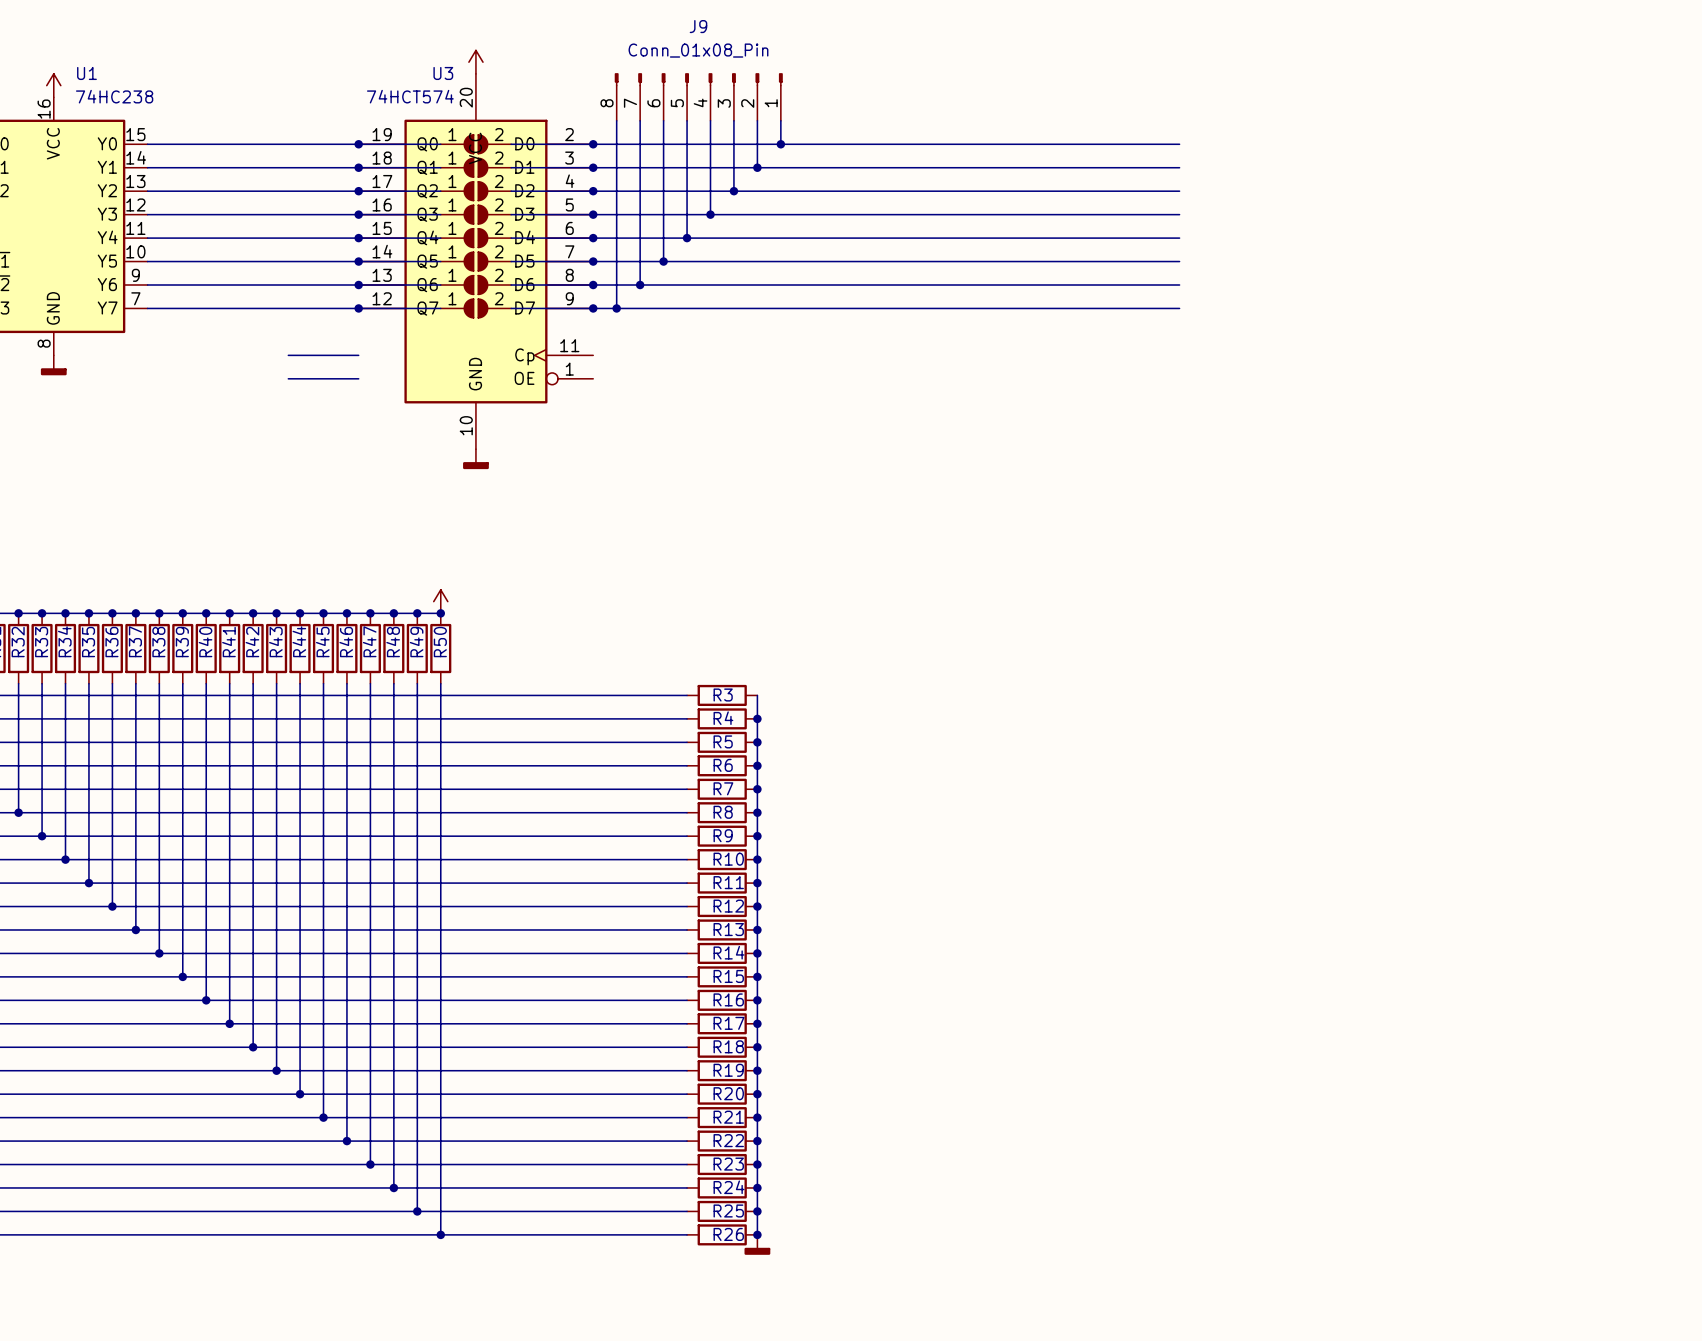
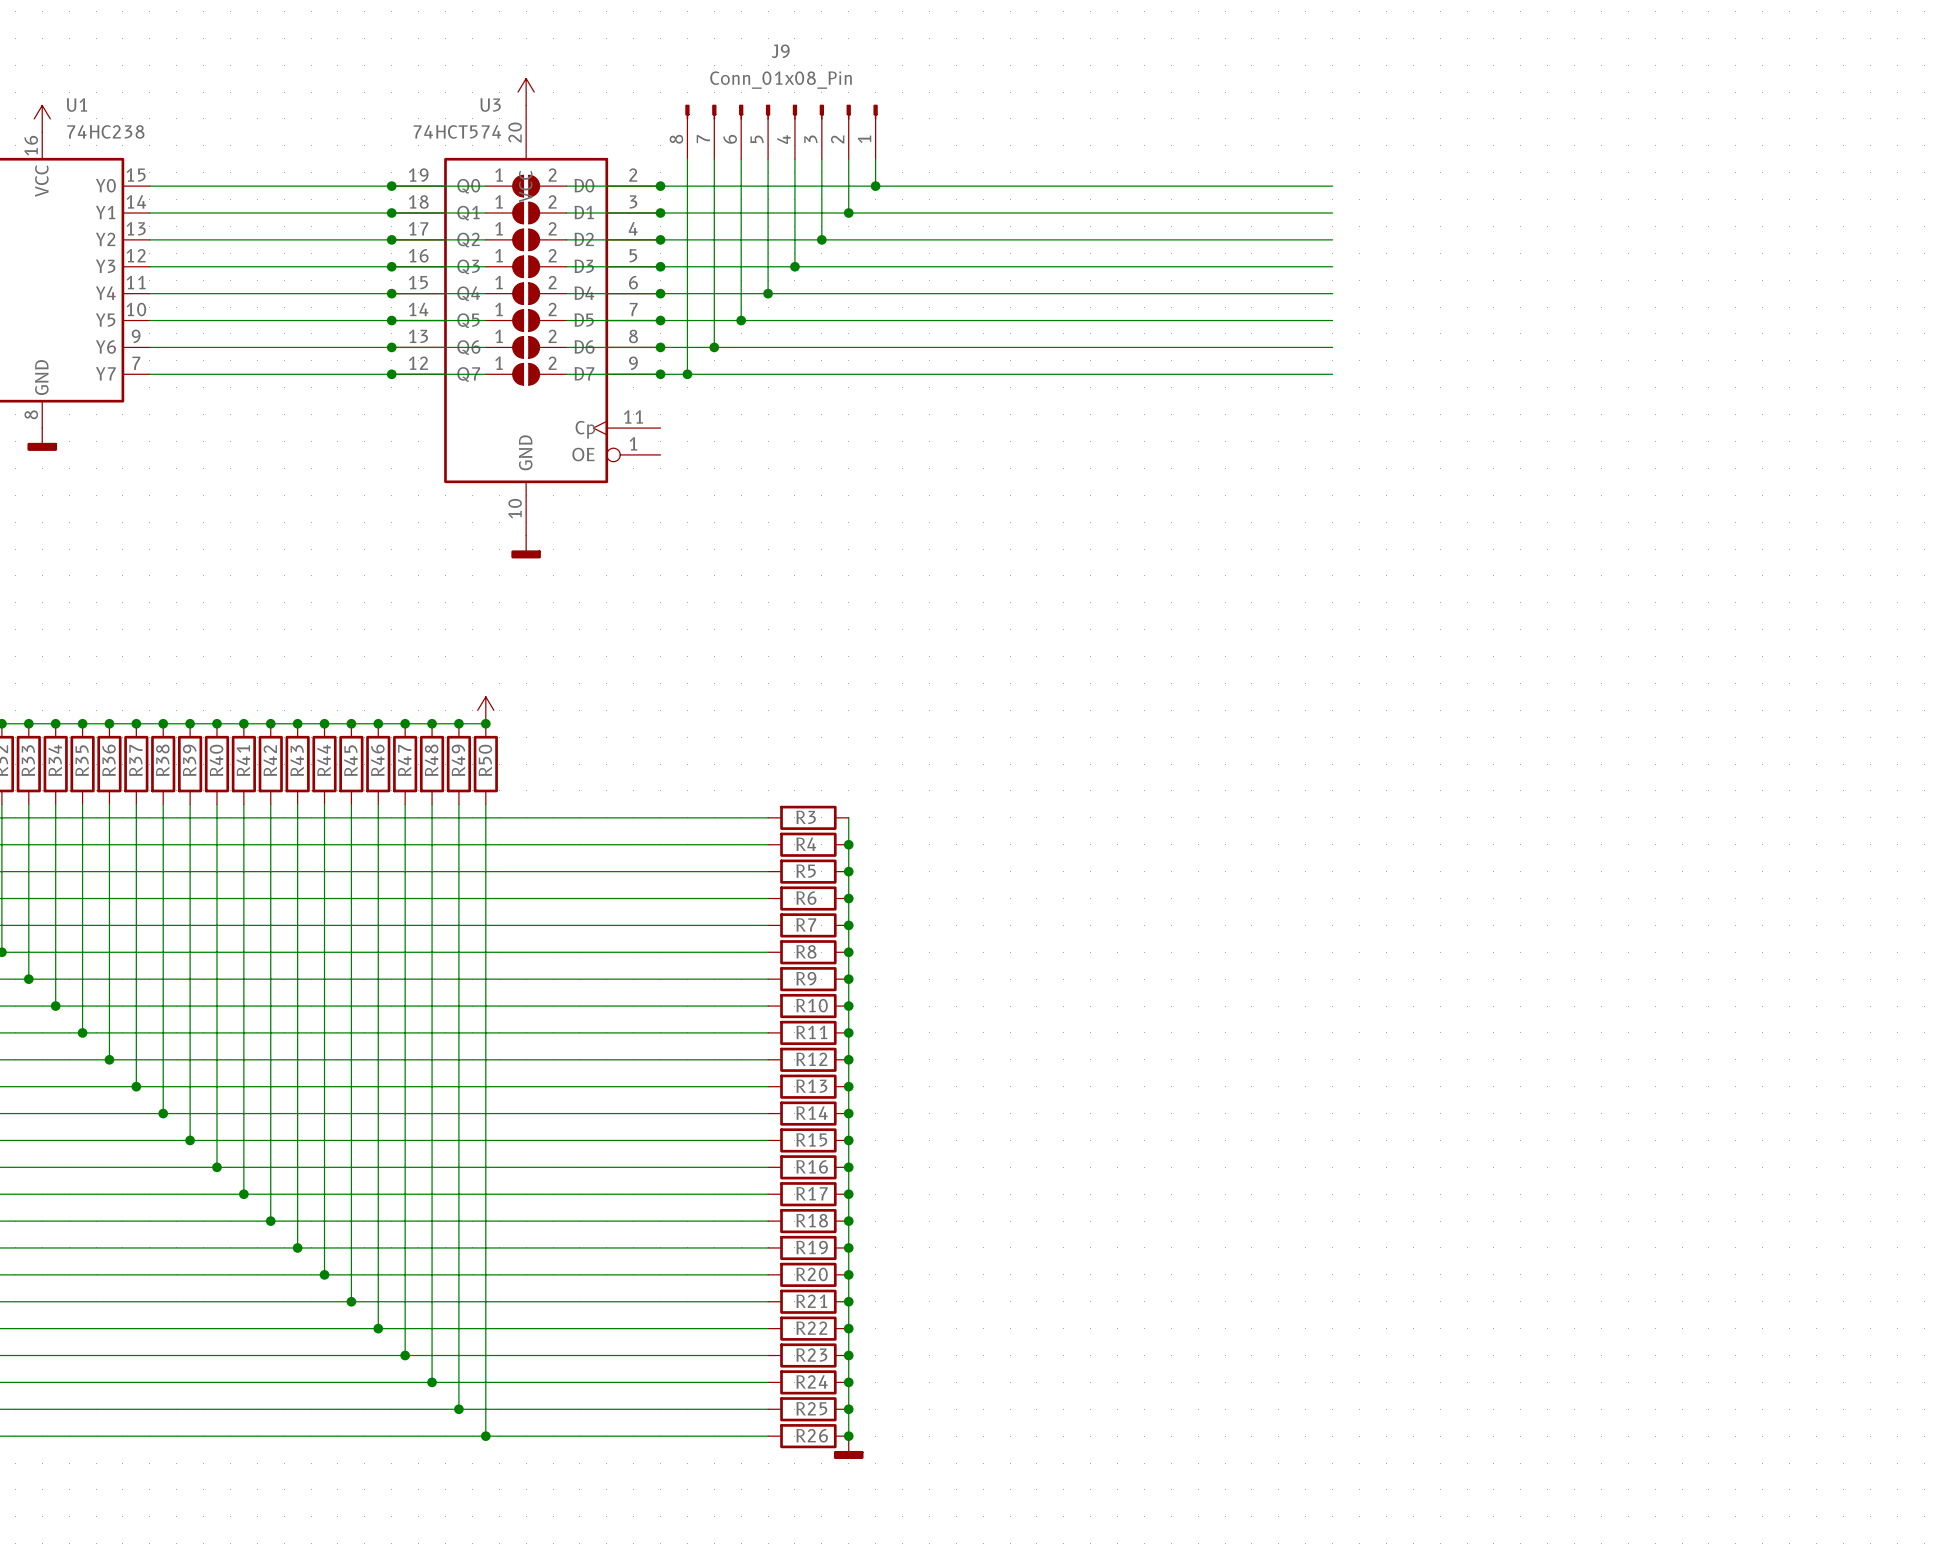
wire: (288, 355) (358, 355) -> none
wire: (288, 378) (358, 378) -> none

